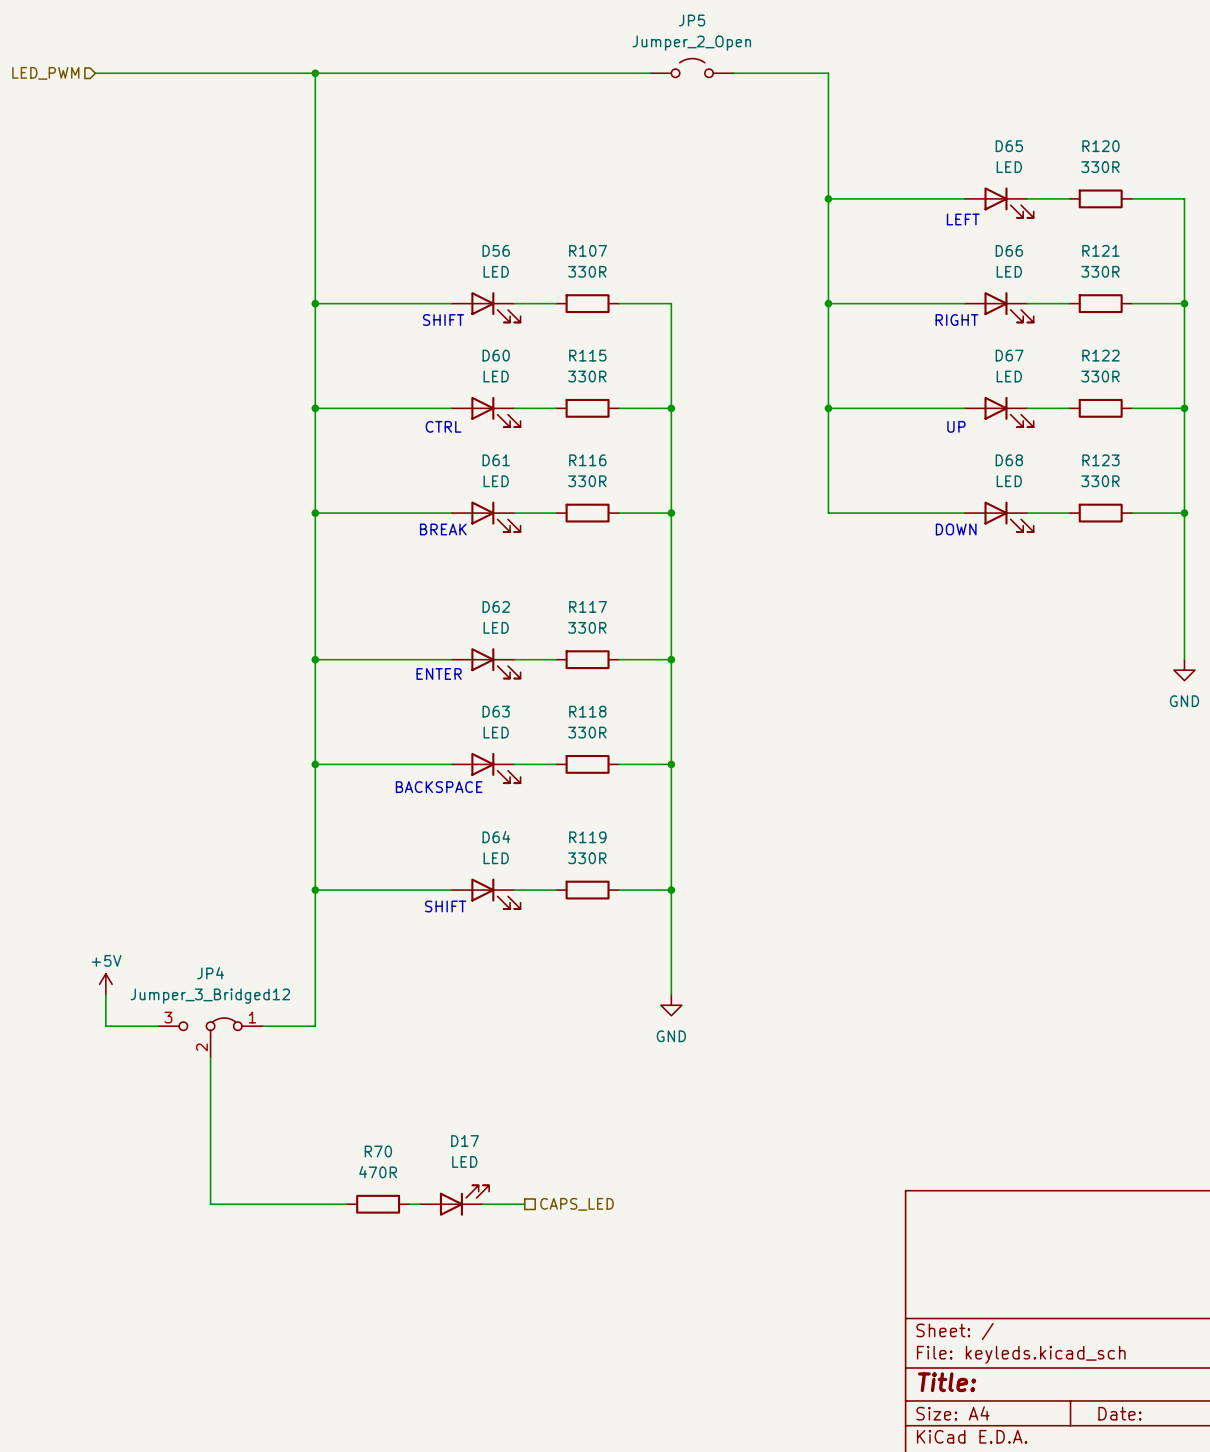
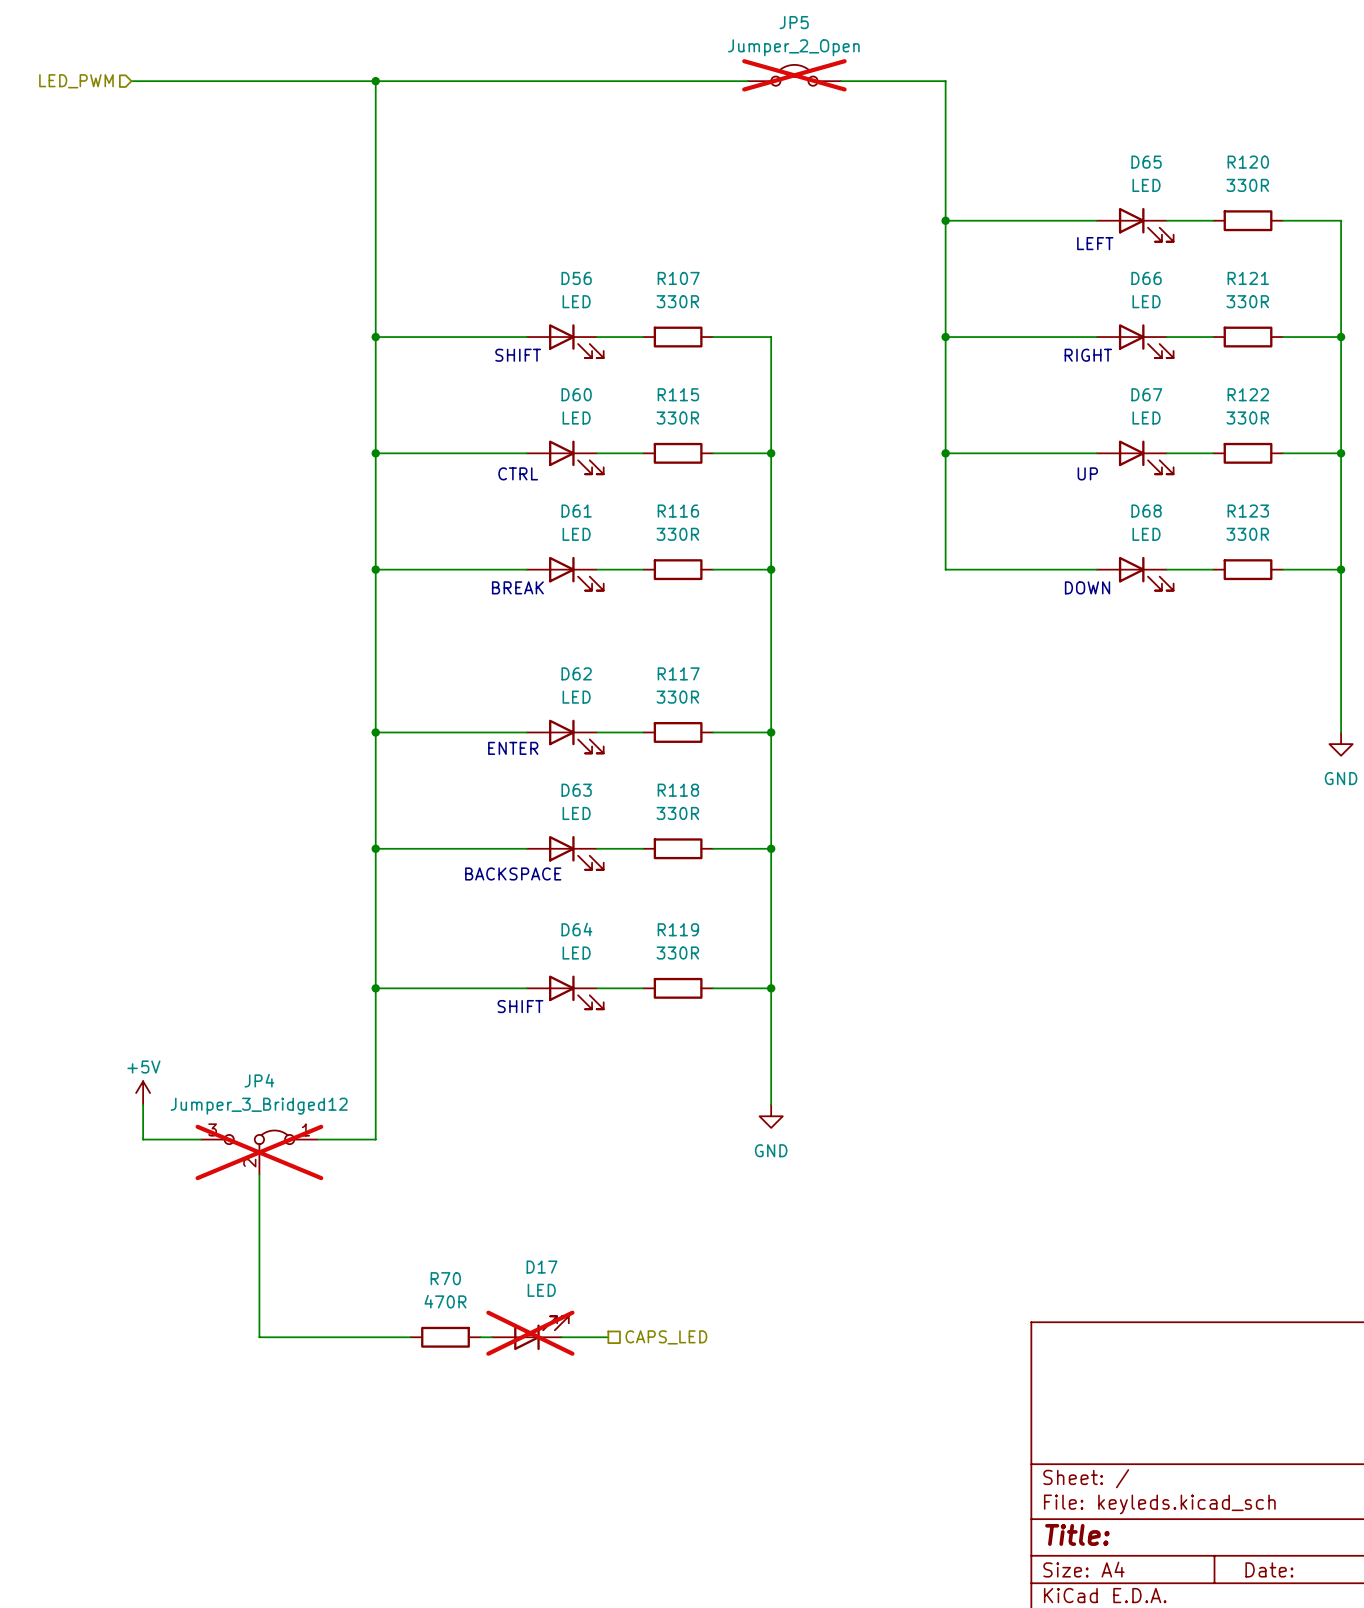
JP5 do-not-place cross: none -> (794, 75)
JP4 do-not-place cross: none -> (259, 1152)
D17 do-not-place cross: none -> (530, 1333)

